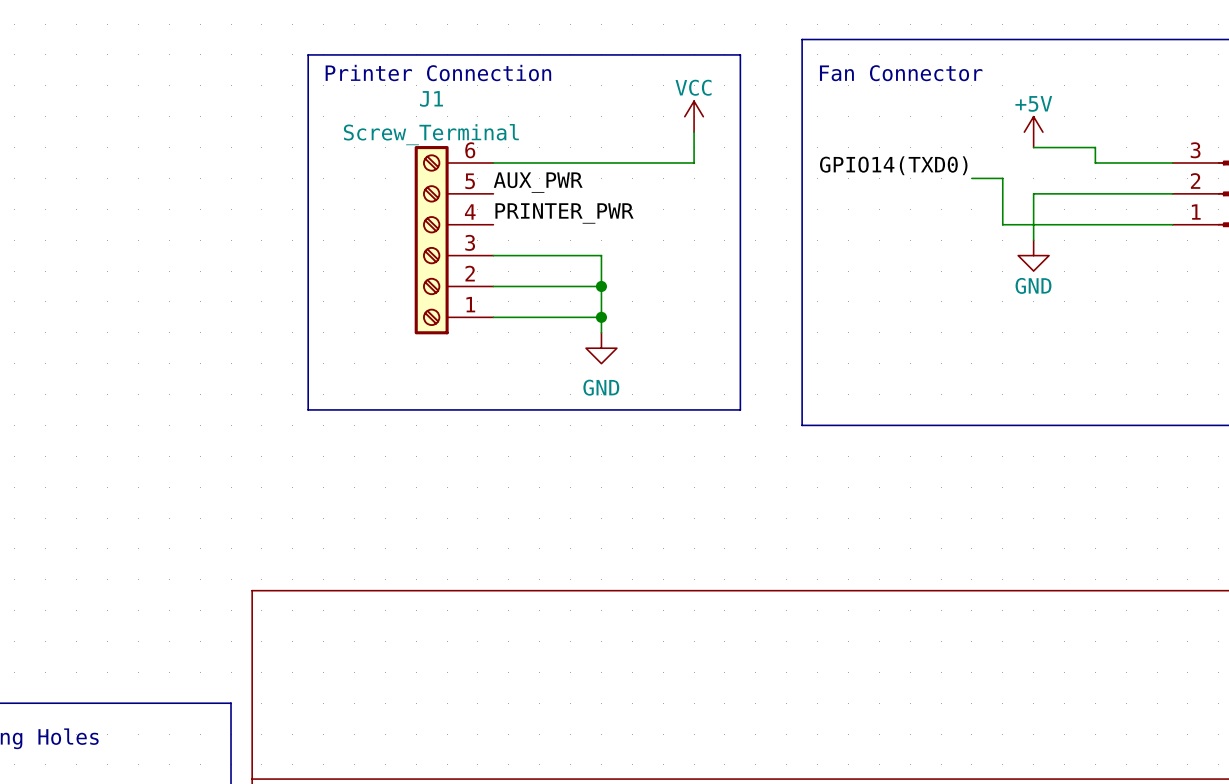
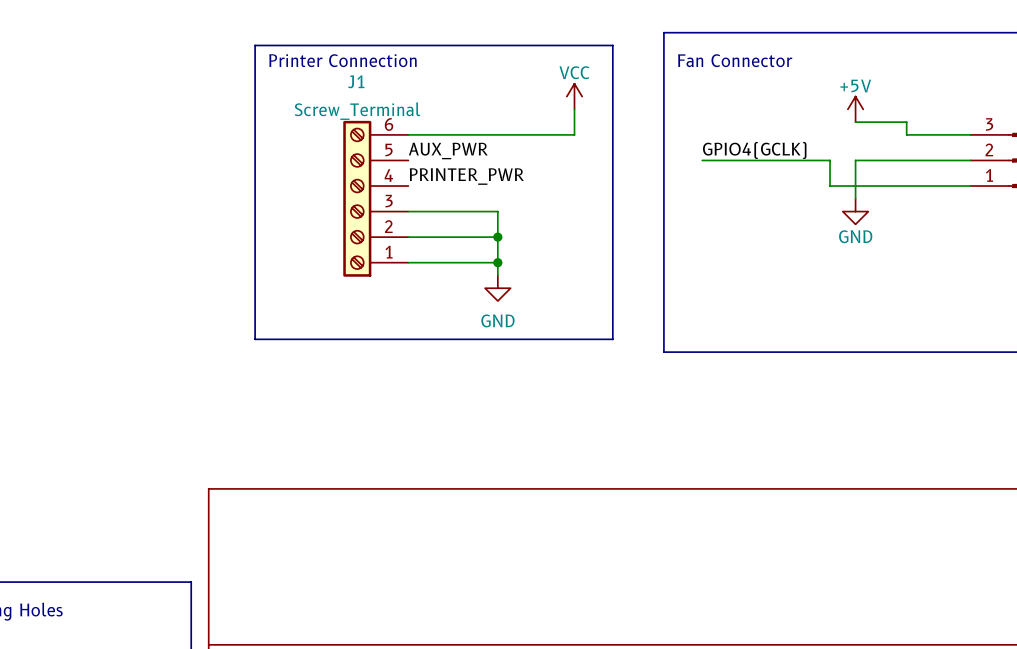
label: GPIO14(TXD0) (893, 165) -> GPIO4(GCLK) (754, 150)
wire: (971, 178) (1002, 178) (1002, 193) -> (702, 160) (830, 160)

